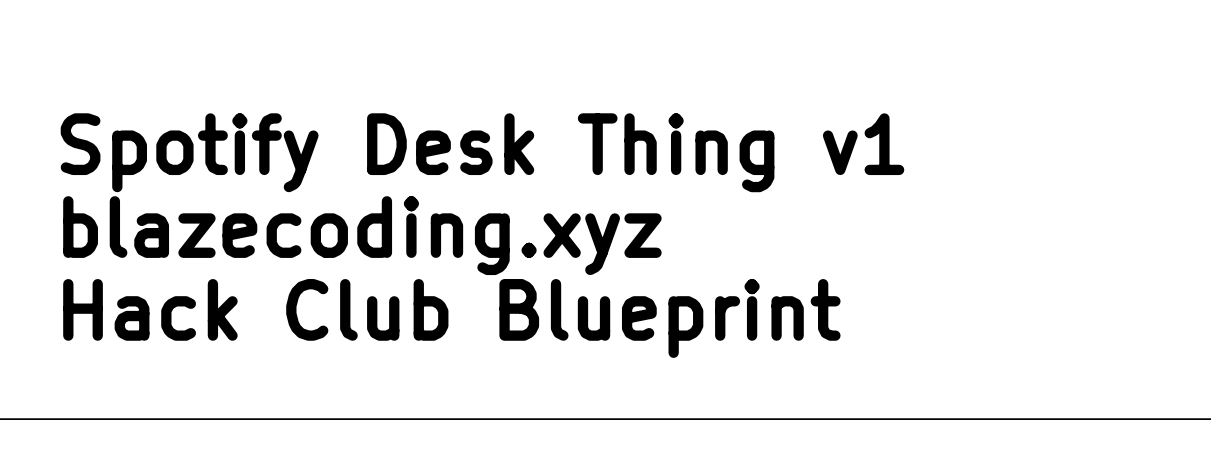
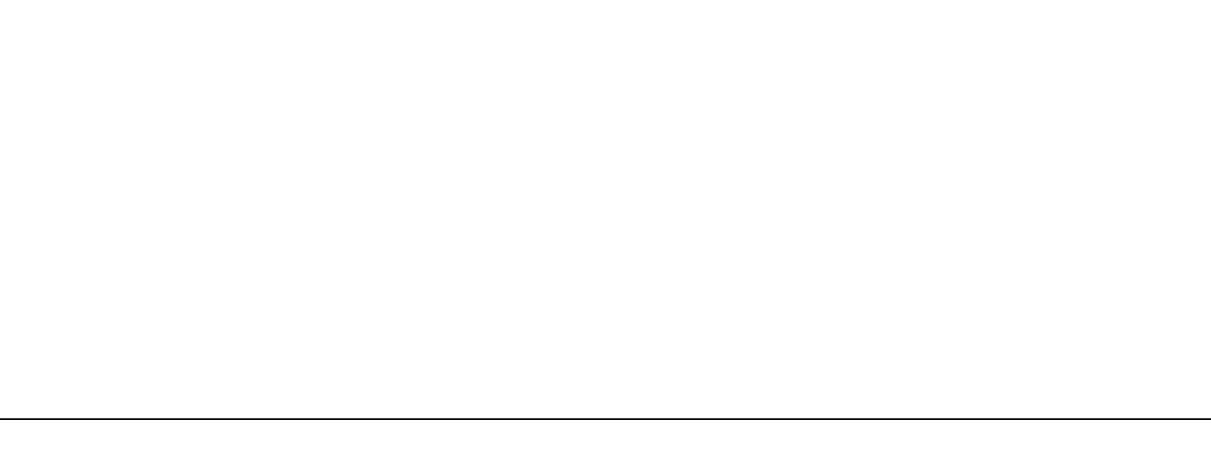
text: Spotify Desk Thing v1 (482, 152) -> none
text: blazecoding.xyz (362, 235) -> none
text: Hack Club Blueprint (451, 318) -> none

